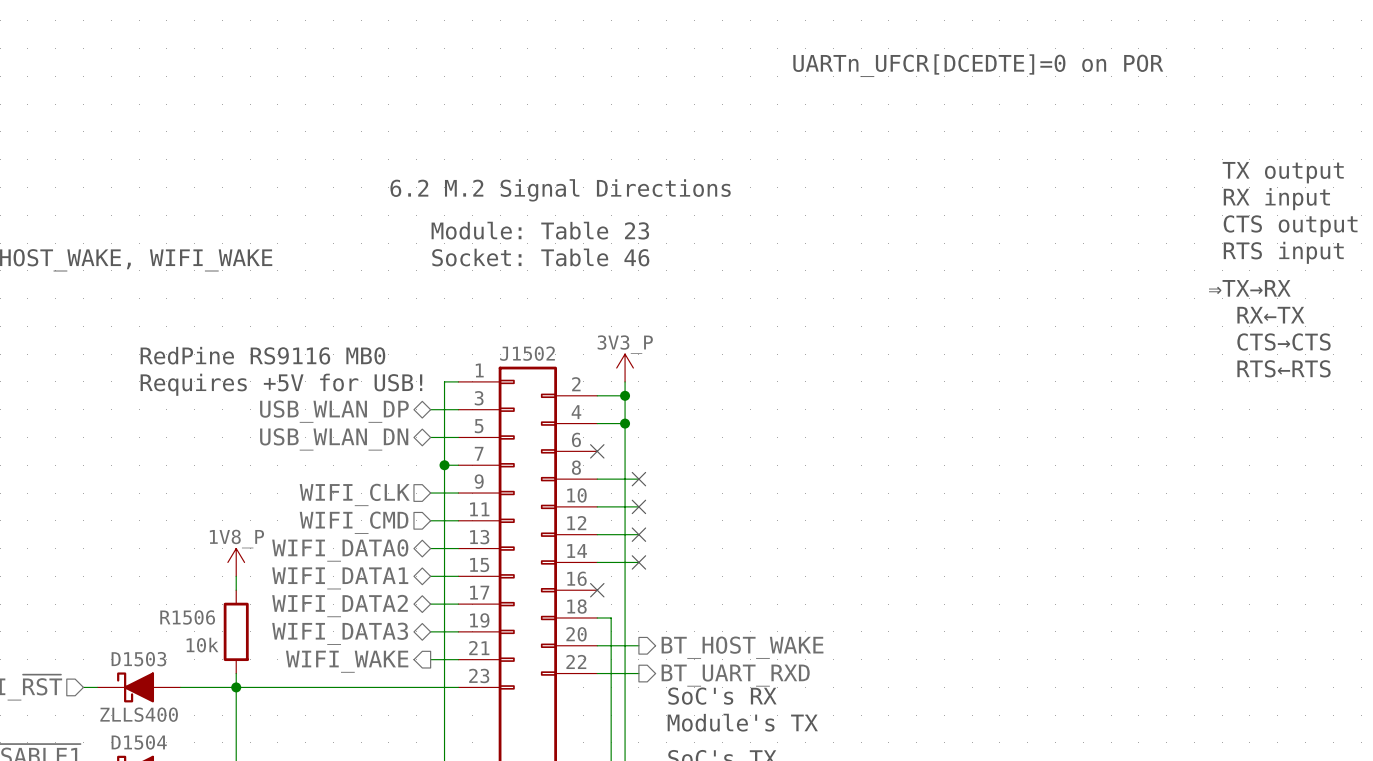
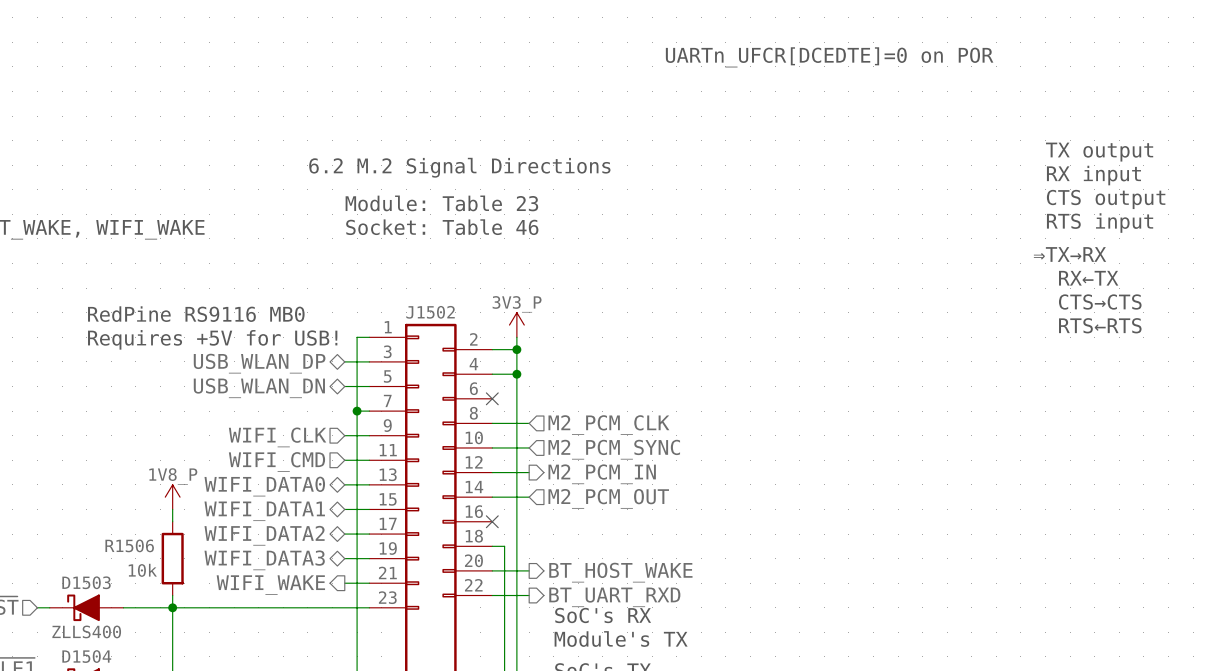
no-connect mark: (638, 479) -> none
hierarchical label: none -> M2_PCM_CLK (608, 425)
no-connect mark: (638, 506) -> none
hierarchical label: none -> M2_PCM_SYNC (614, 449)
no-connect mark: (638, 534) -> none
hierarchical label: none -> M2_PCM_IN (602, 474)
no-connect mark: (638, 562) -> none
hierarchical label: none -> M2_PCM_OUT (608, 498)

